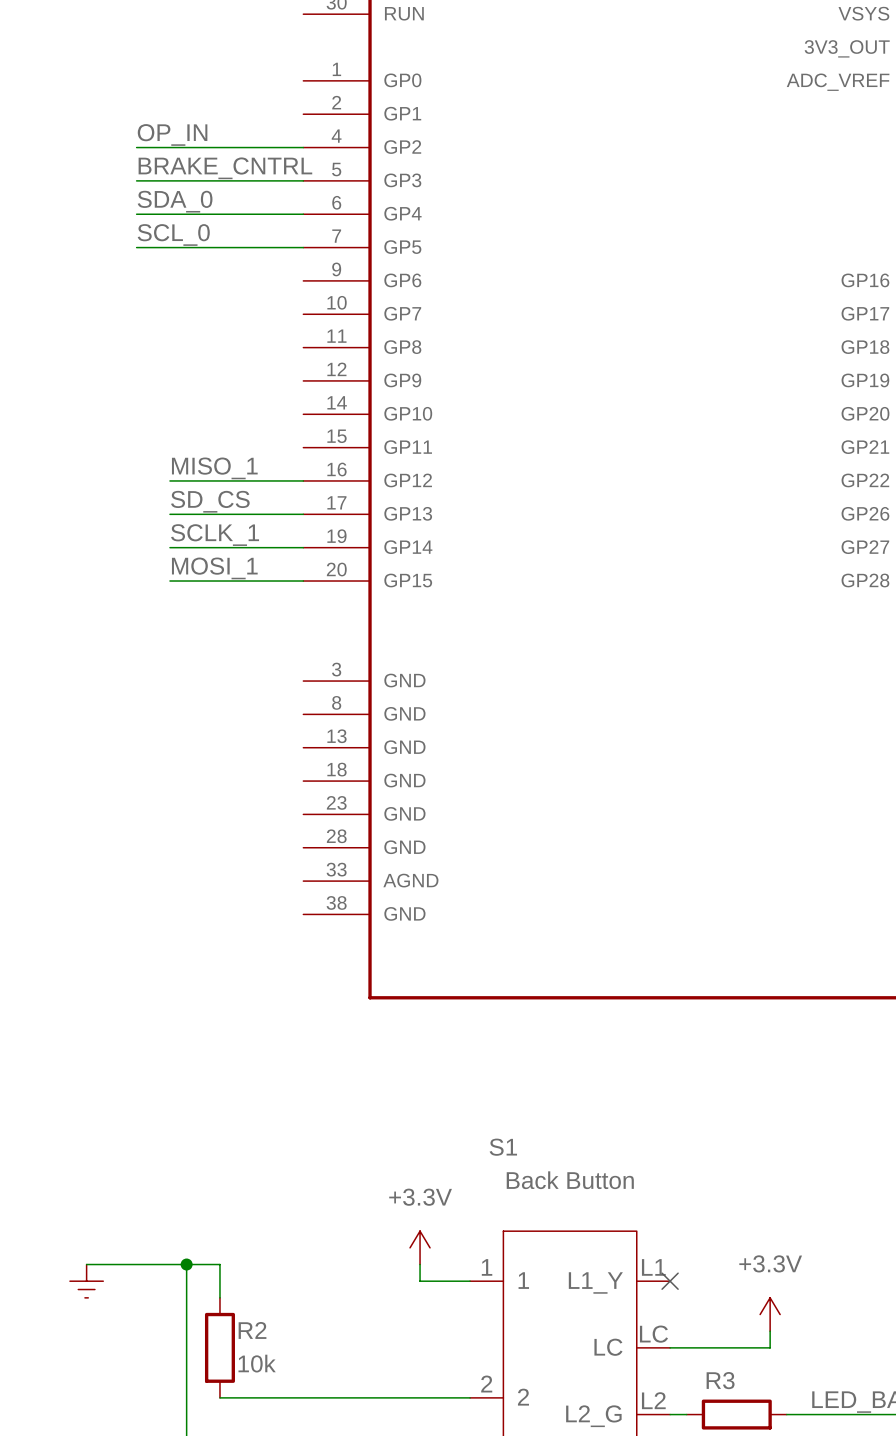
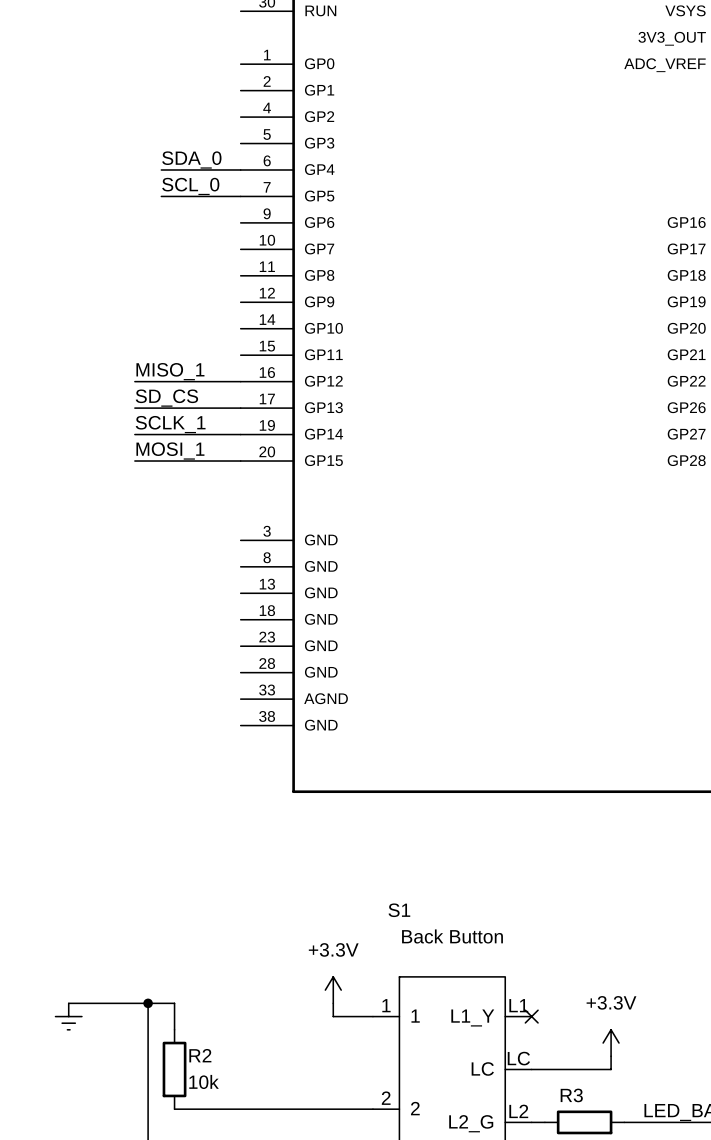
label: OP_IN (172, 134) -> none
wire: (136, 147) (303, 147) -> none
label: BRAKE_CNTRL (225, 168) -> none
wire: (136, 180) (303, 180) -> none
label position: SDA_0 (175, 201) -> SDA_0 (191, 160)
wire: (136, 214) (203, 214) -> none
label position: SCL_0 (173, 234) -> SCL_0 (190, 186)
wire: (136, 247) (203, 247) -> none

